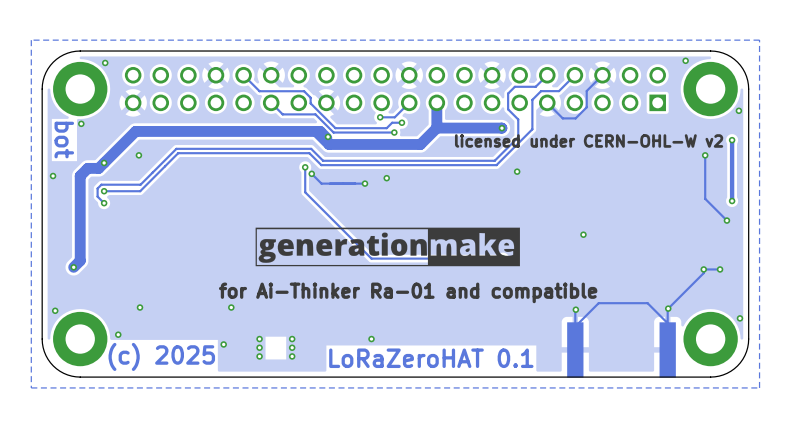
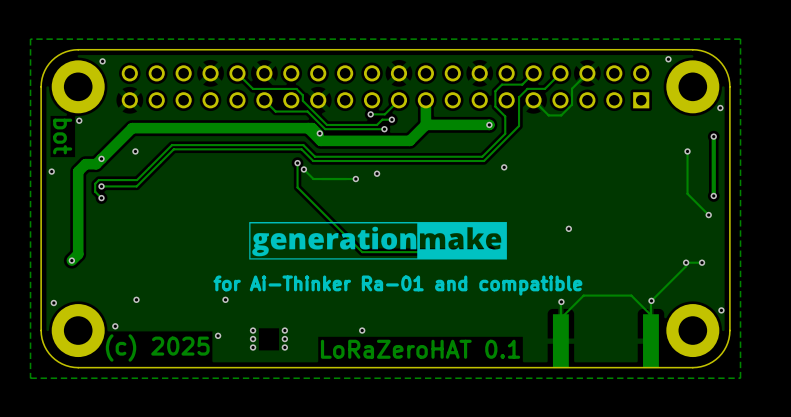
text: licensed under CERN-OHL-W v2 (589, 140) -> none

